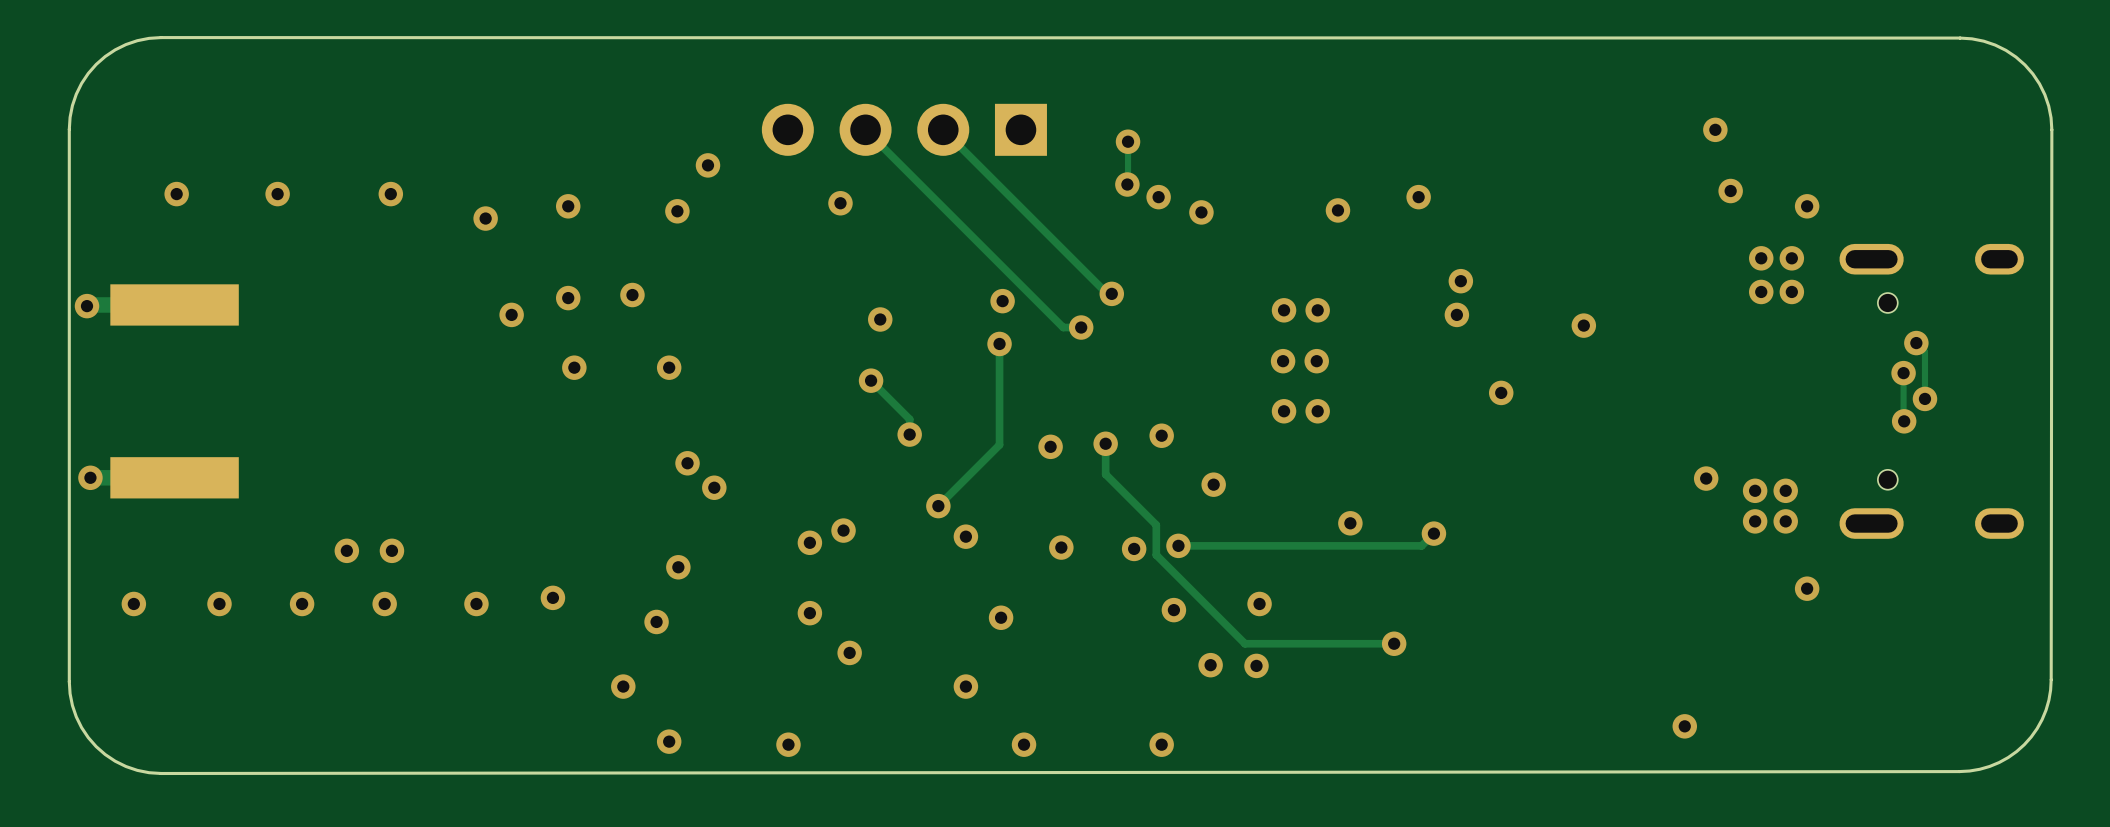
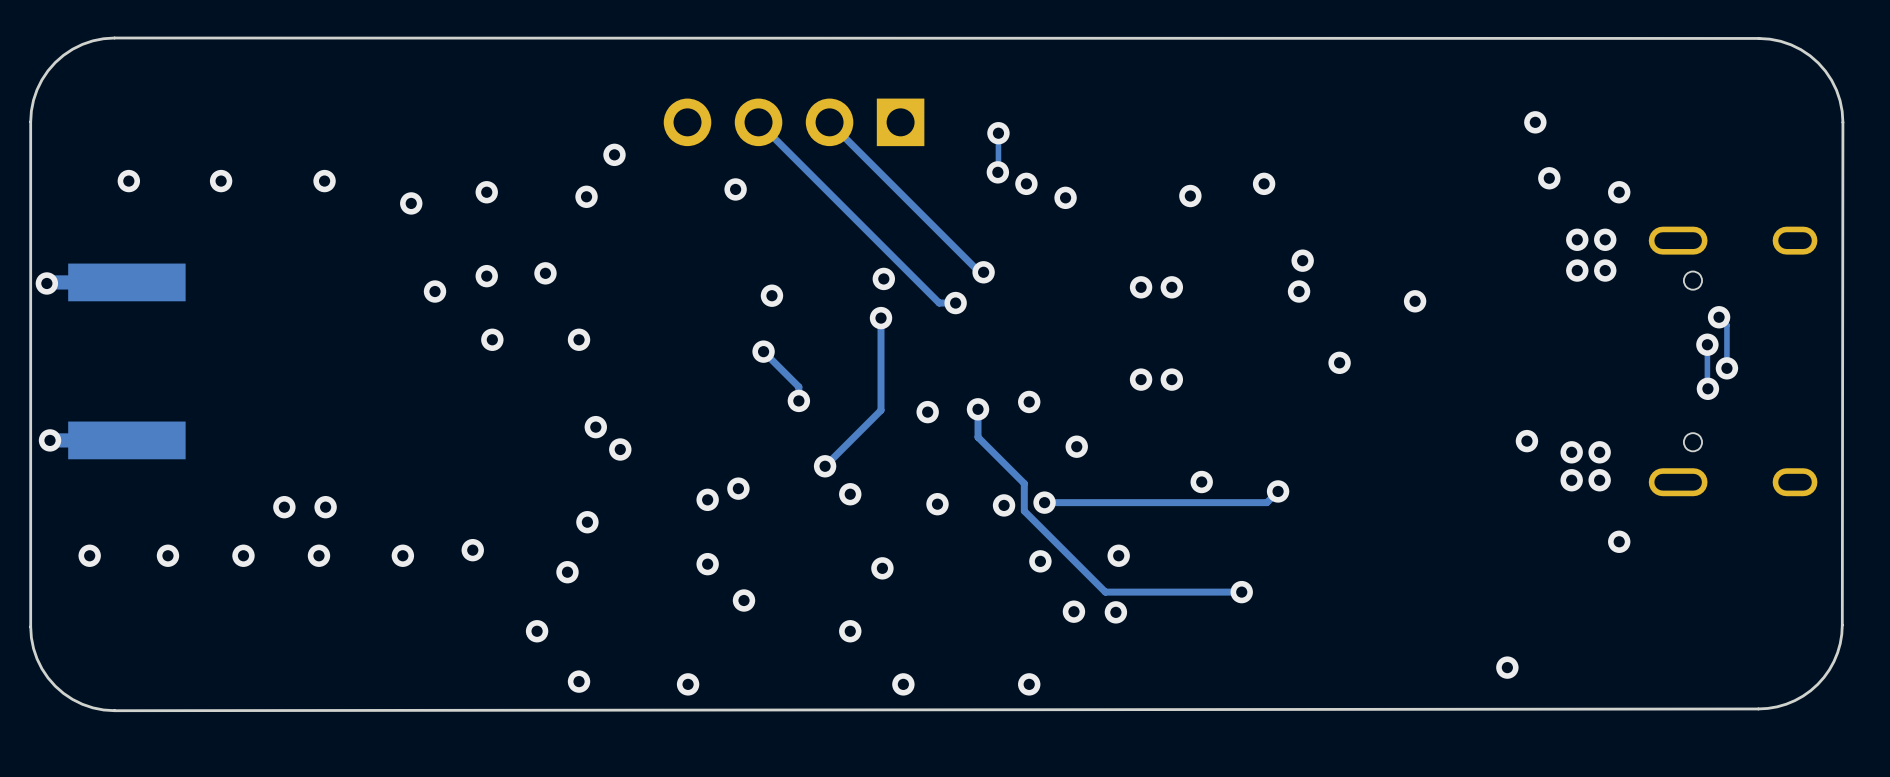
via: (1283, 361) -> none
via: (1316, 361) -> none

